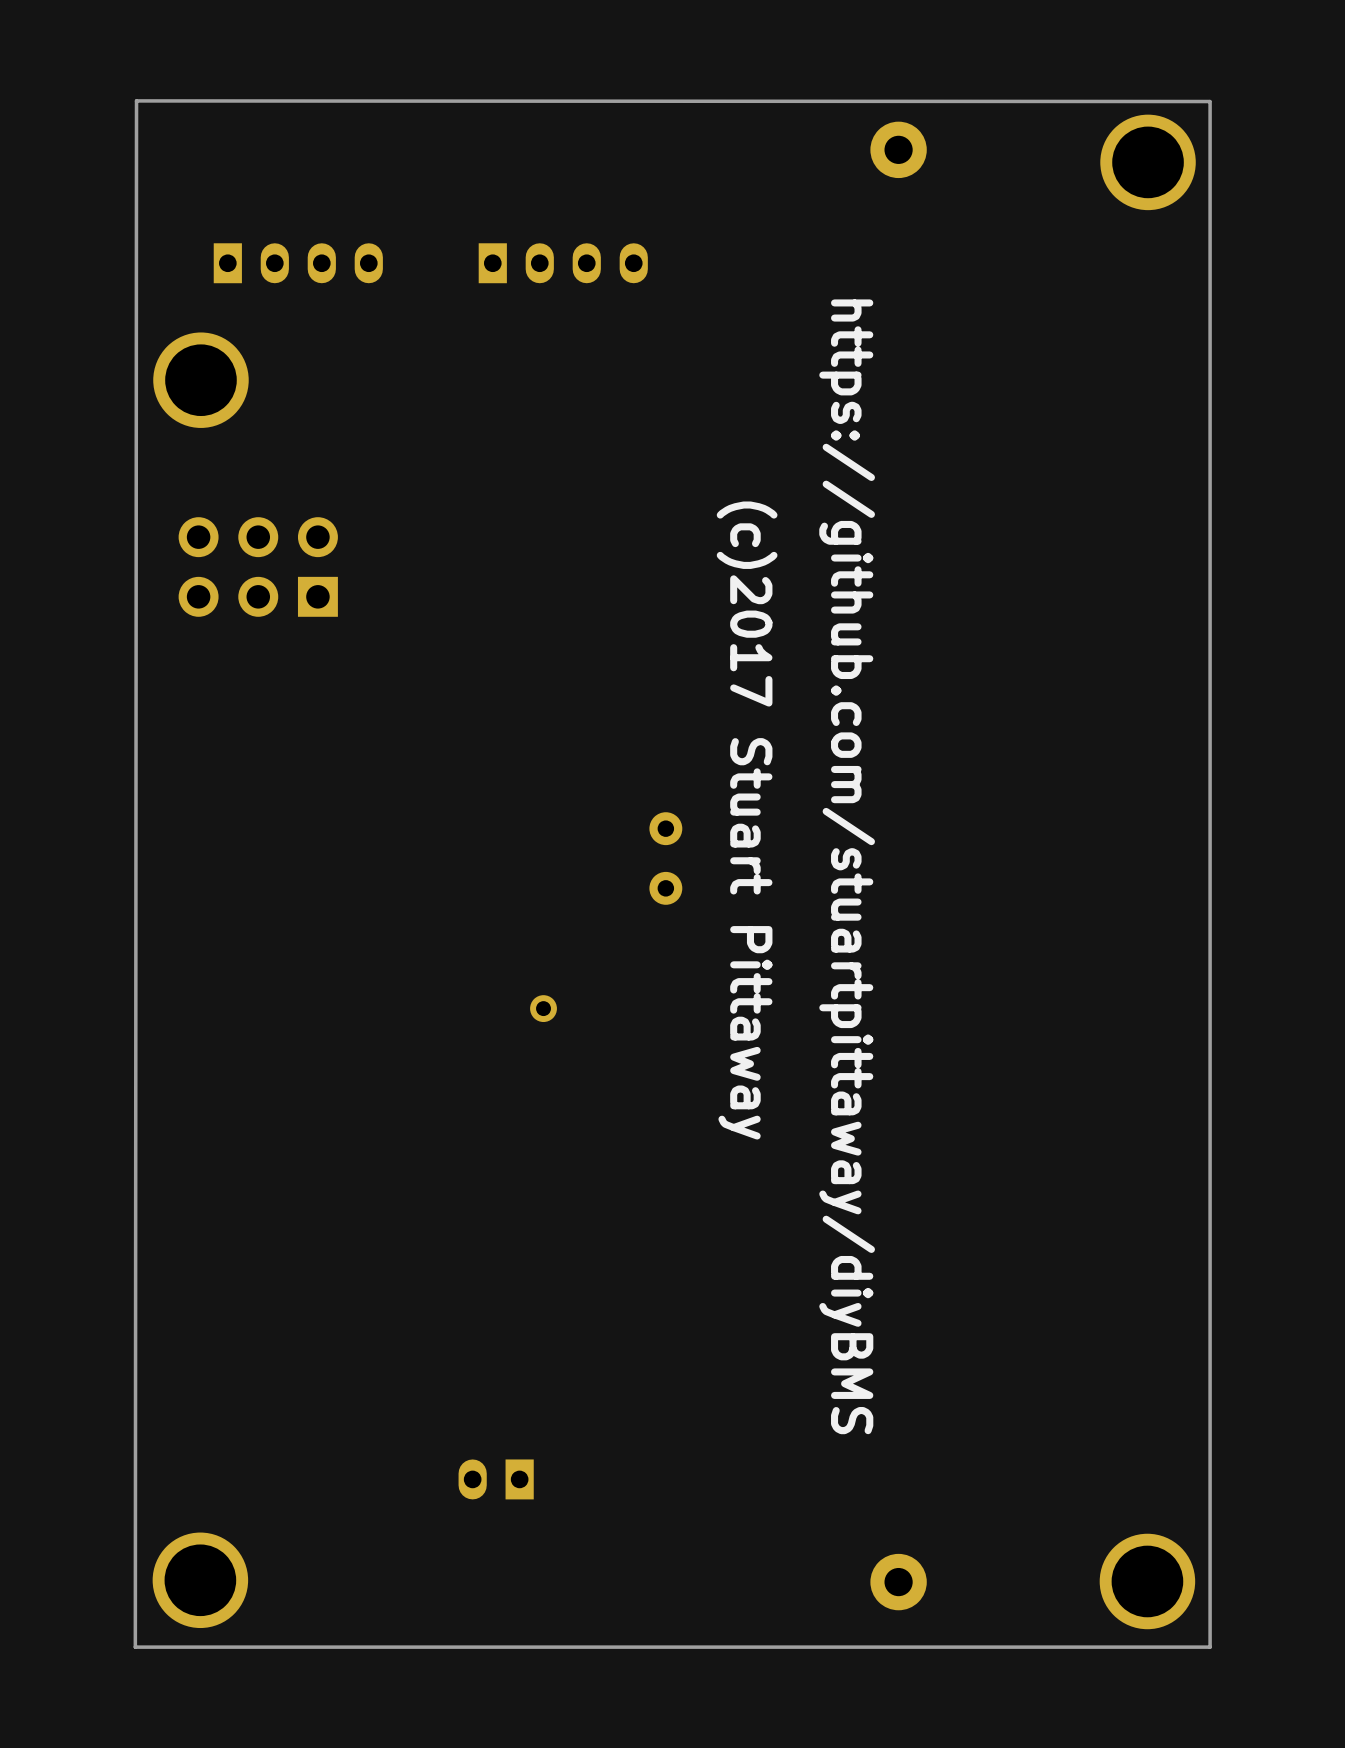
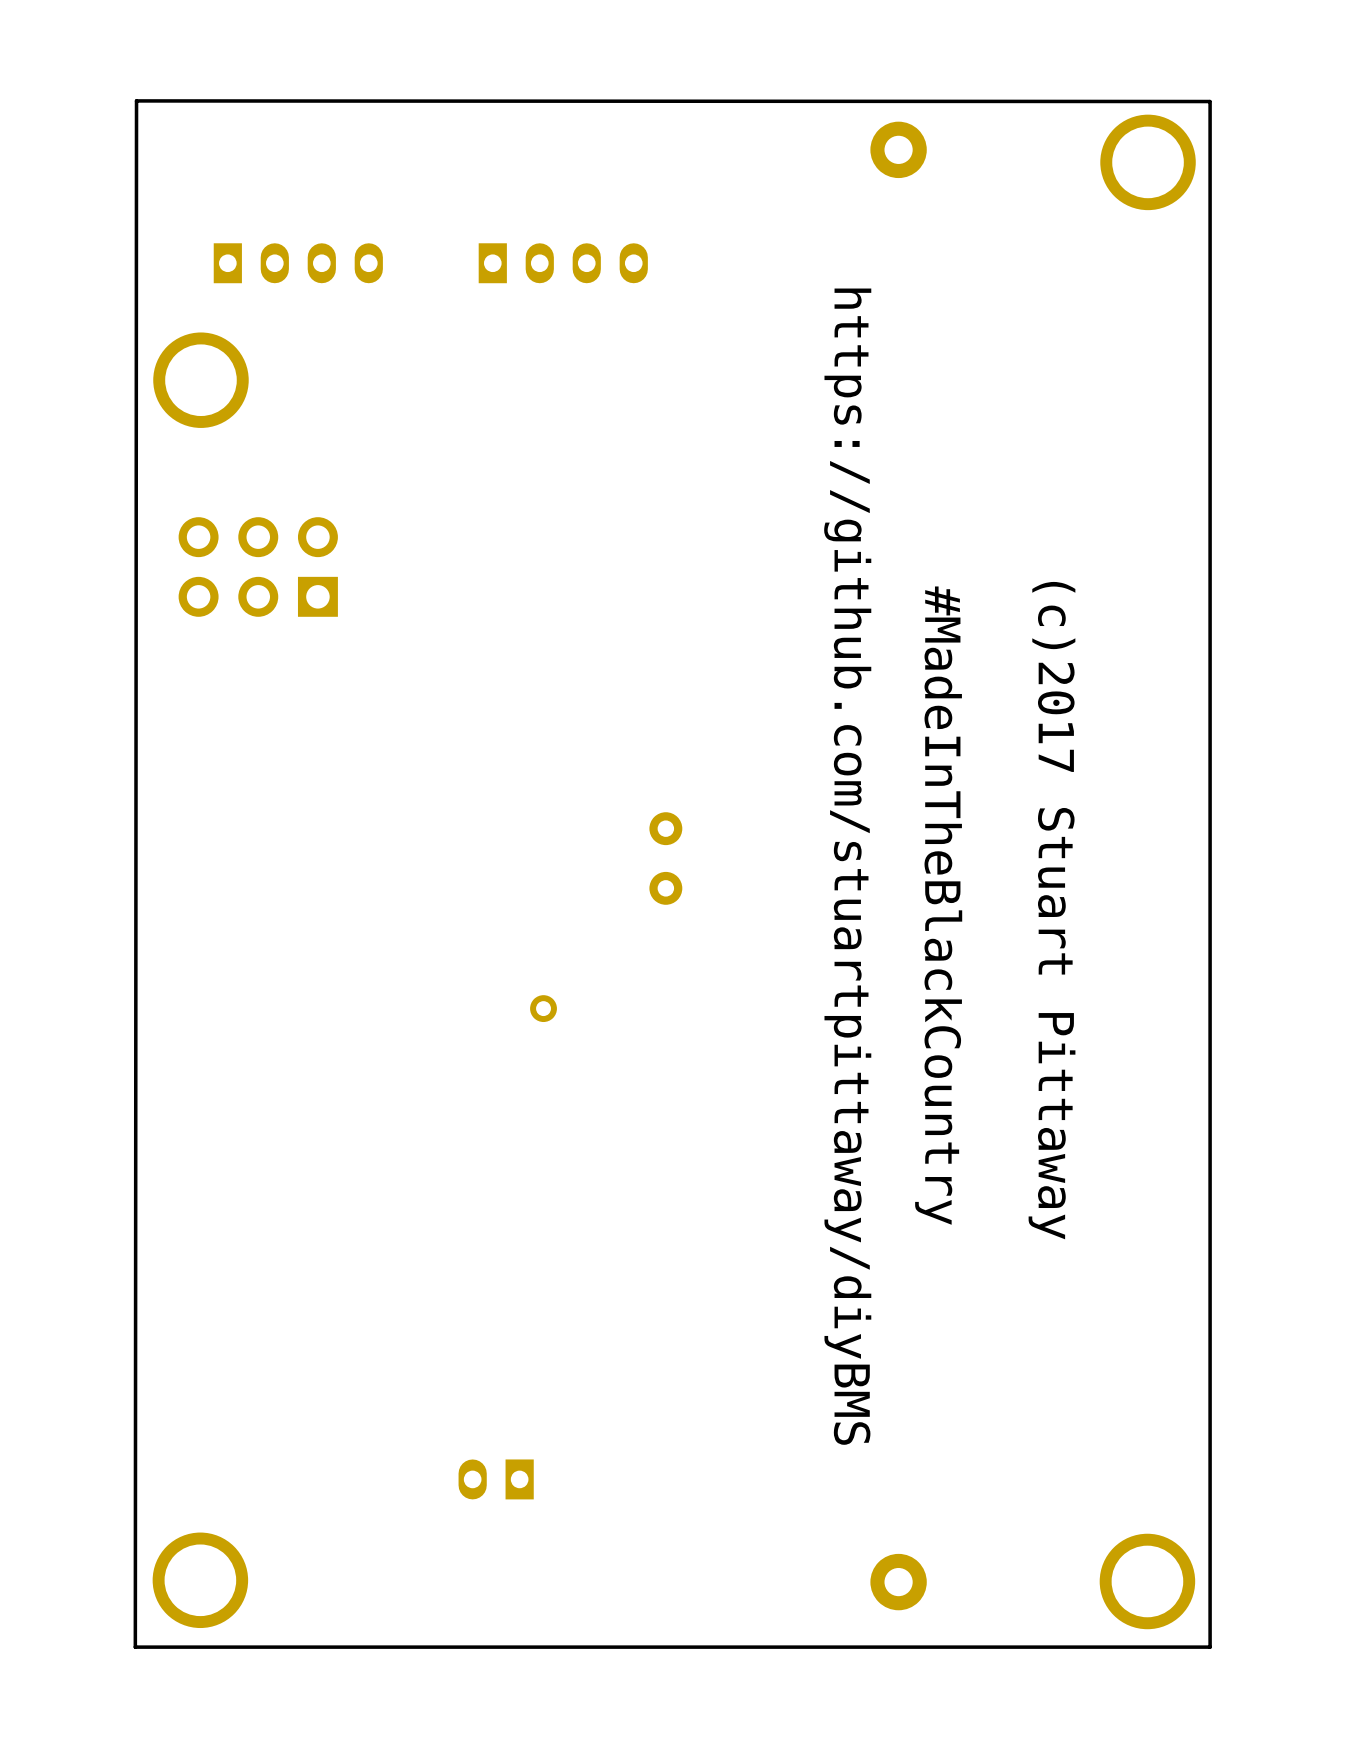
text position: (c)2017 Stuart Pittaway (747, 820) -> (c)2017 Stuart Pittaway (1052, 910)
text: none -> #MadeInTheBlackCountry (938, 905)

